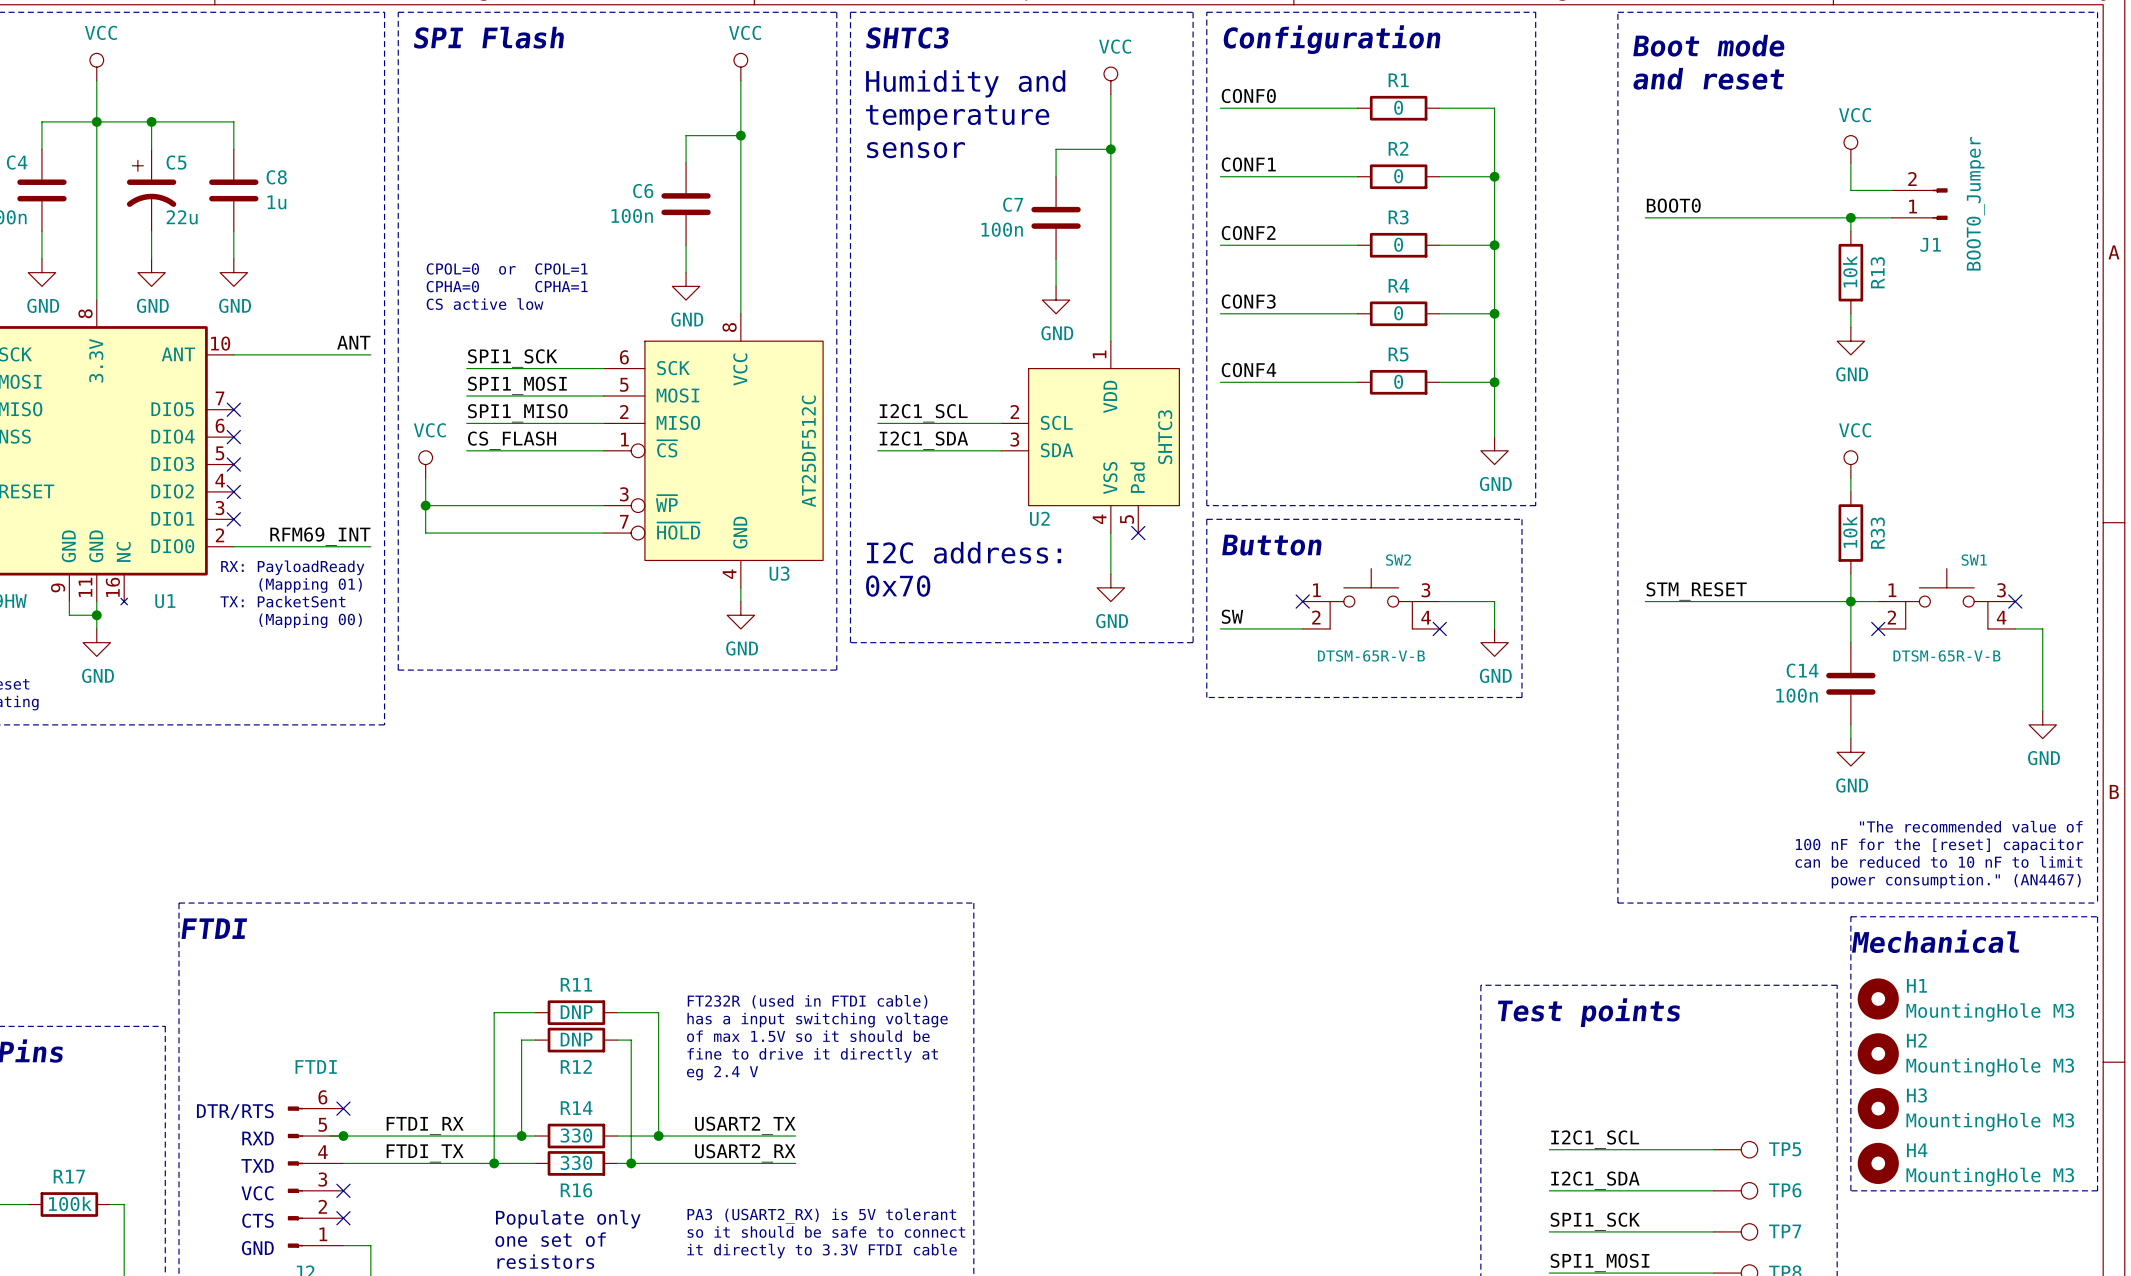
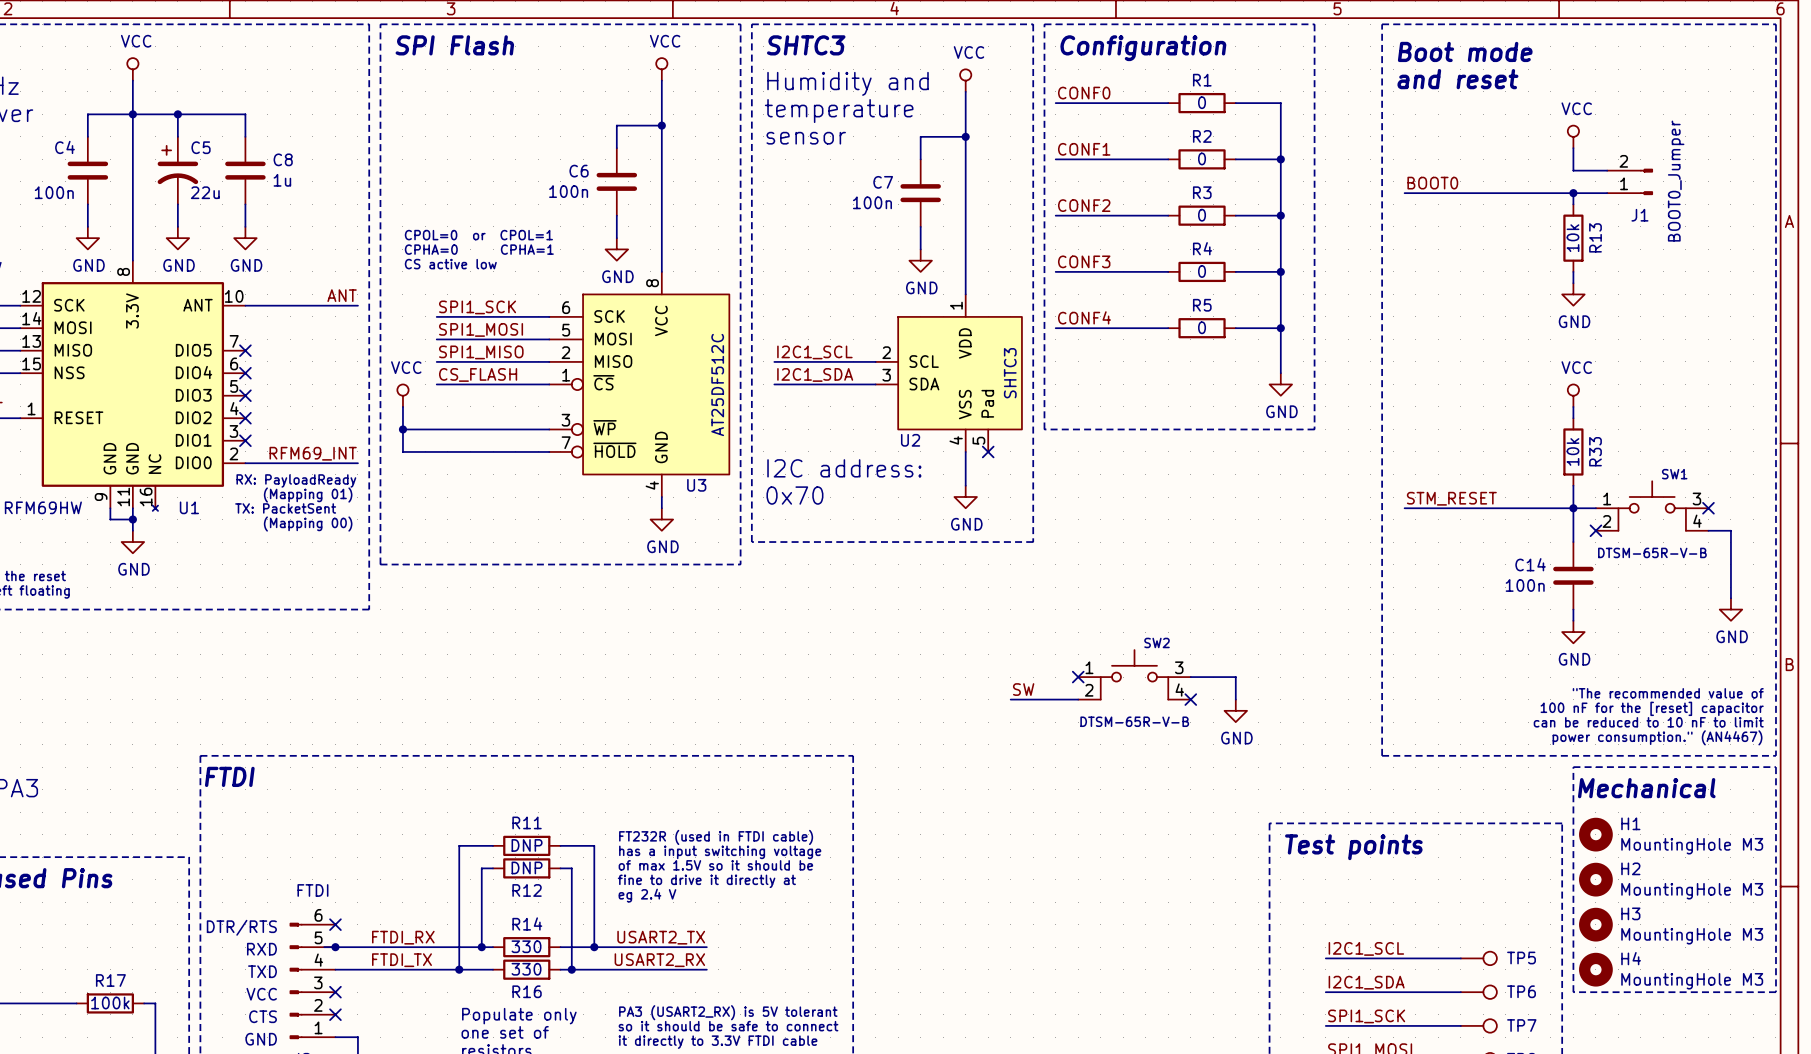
line: (1206, 519) (1521, 519) (1521, 697) (1206, 697) (1206, 519) -> none
text: Button (1271, 545) -> none
SW2 position: (1371, 598) -> (1134, 674)
no-connect mark: (1302, 601) -> none
wire: (1439, 601) (1494, 601) (1494, 628) -> (1190, 677) (1235, 677) (1235, 699)
label position: SW (1232, 616) -> SW (1023, 689)
wire: (1220, 628) (1302, 628) -> (1010, 699) (1078, 699)
no-connect mark: (1439, 628) -> none
power symbol position: GND (1494, 642) -> GND (1235, 710)
no-connect mark: none -> (1078, 677)
no-connect mark: none -> (1190, 699)

